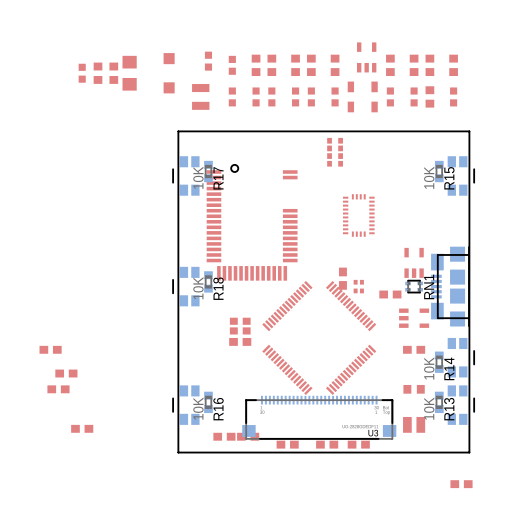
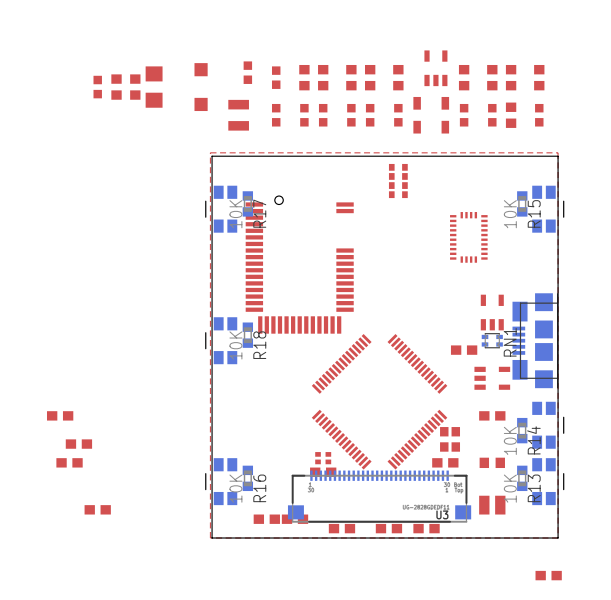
top zone outline: none -> (558, 152) (210, 152) (210, 538) (558, 538) (558, 152)
part position: (358, 215) -> (468, 237)
part: (342, 278) -> none
part rotation: 0° (358, 286) -> 90° clockwise (323, 458)
part position: (358, 286) -> (323, 458)
part rotation: 0° (240, 326) -> 90° clockwise (450, 439)
part position: (240, 326) -> (450, 439)
part position: (240, 341) -> (323, 472)
part: none -> (445, 462)

